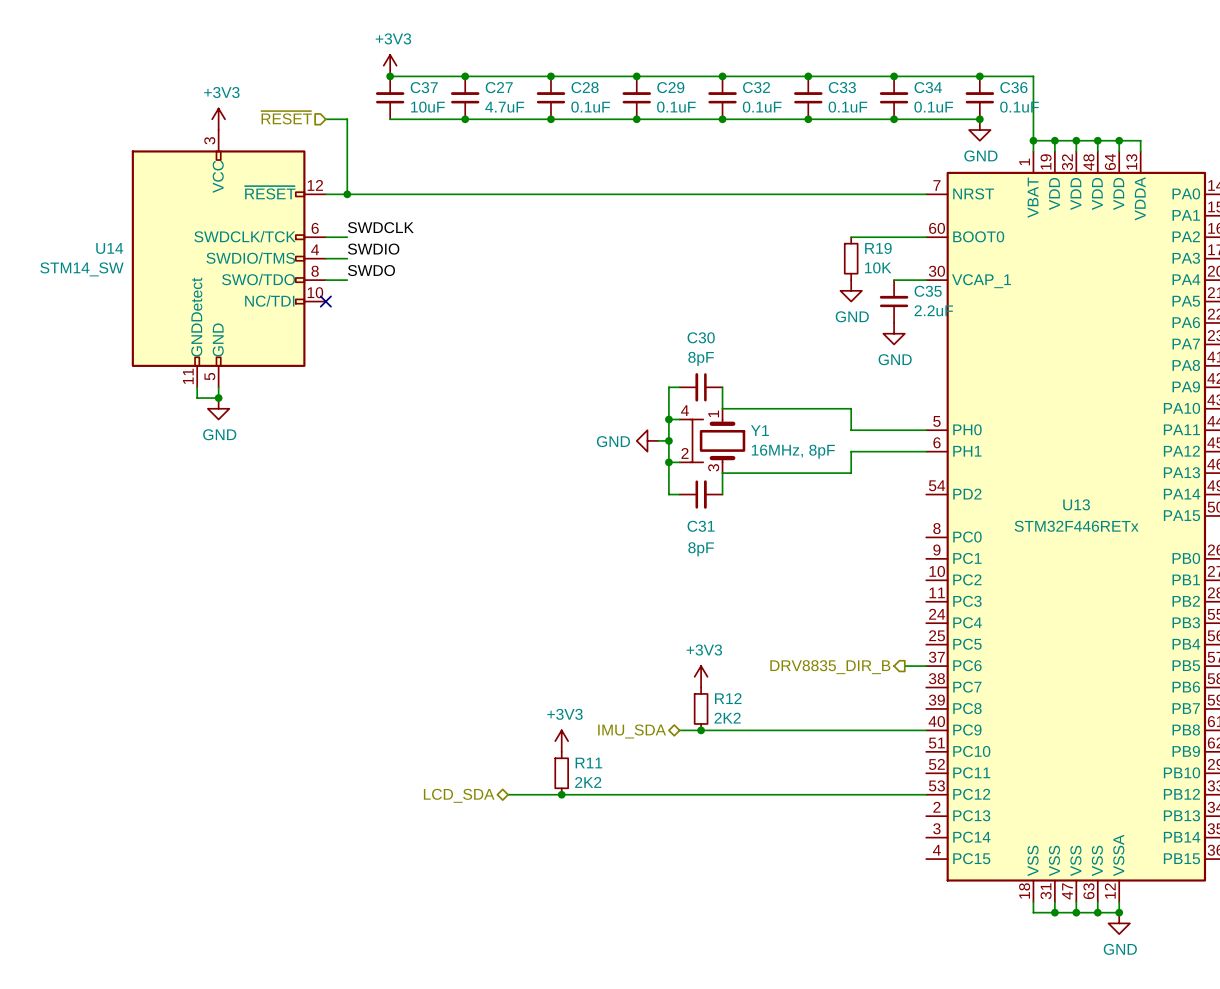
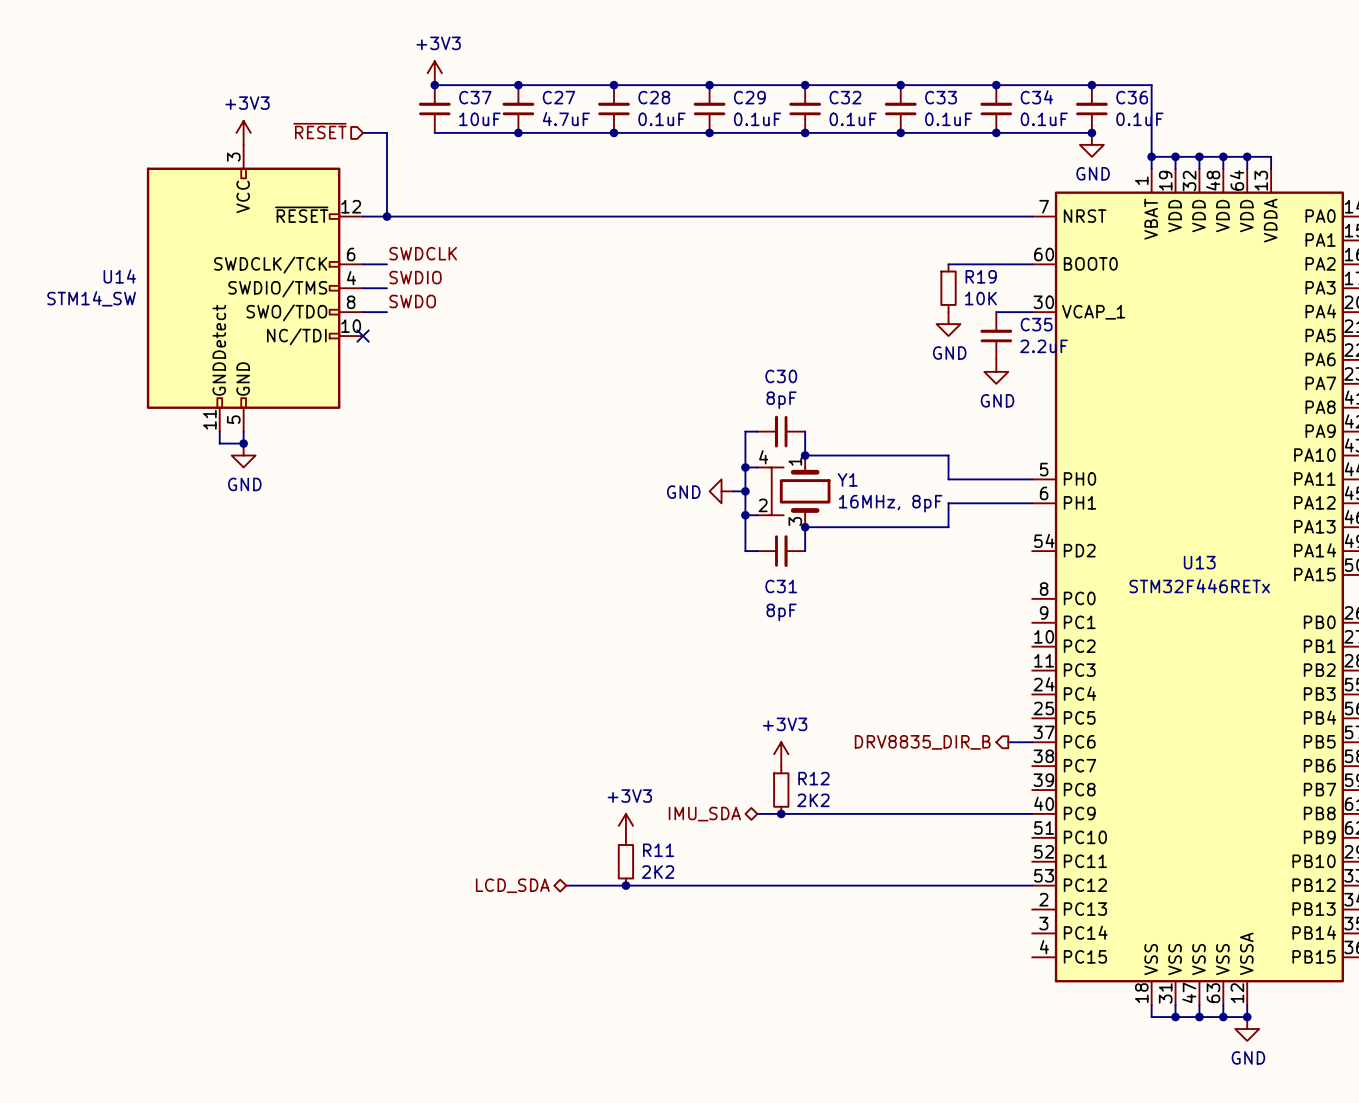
junction: none -> (805, 455)
junction: none -> (805, 527)

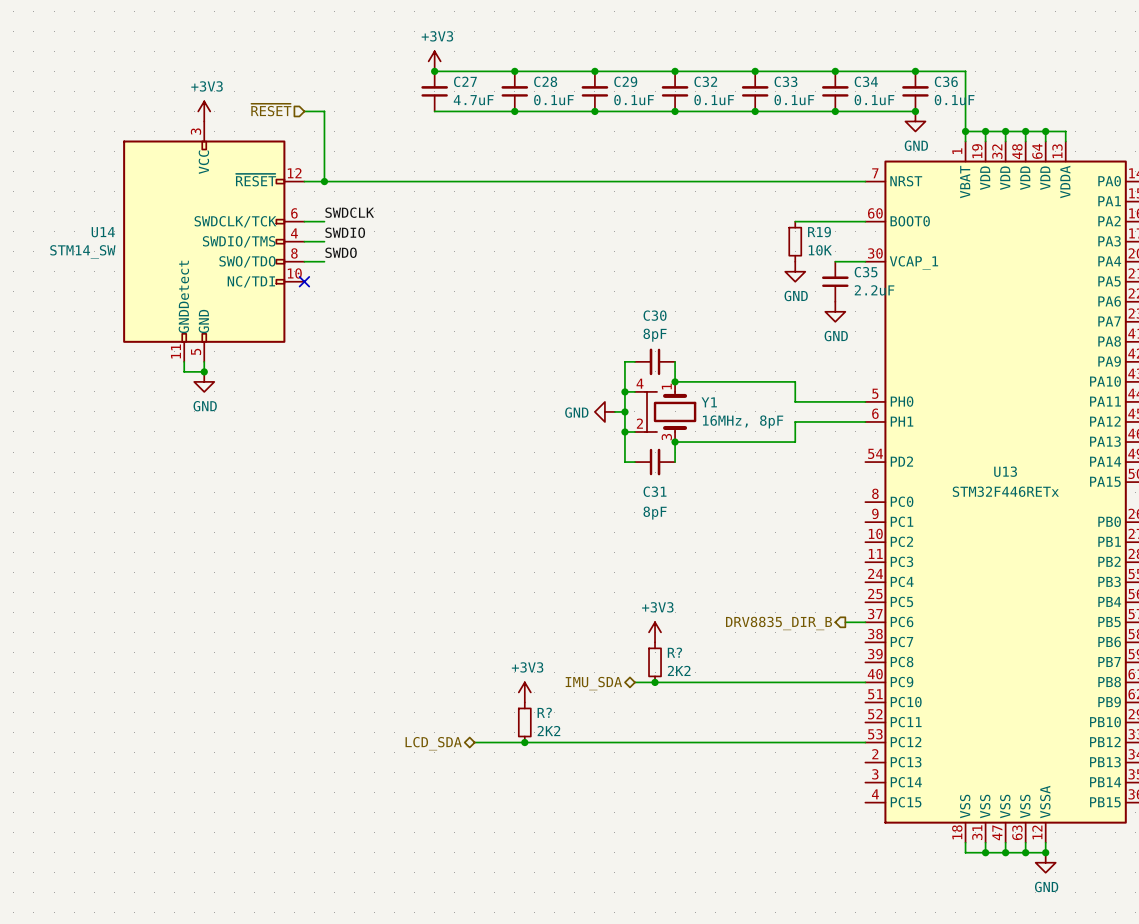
power symbol position: +3V3 (434, 73) -> +3V3 (434, 61)
wire: (434, 85) (518, 85) -> none
junction: (434, 85) -> none
C37: 10uF (434, 109) -> none
wire: (434, 132) (518, 132) -> none
junction: (518, 132) -> none
R12 name: R12 (813, 778) -> R? (674, 652)
R11 name: R11 (658, 850) -> R? (544, 712)

